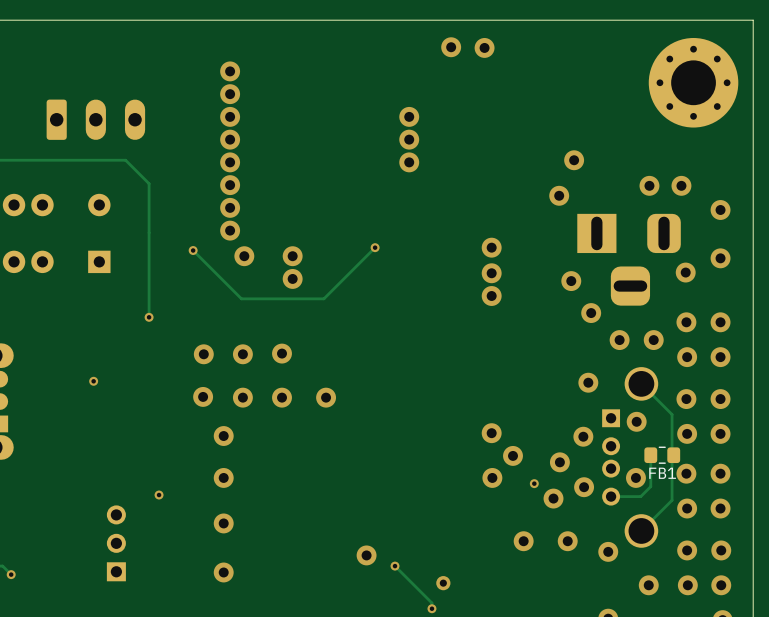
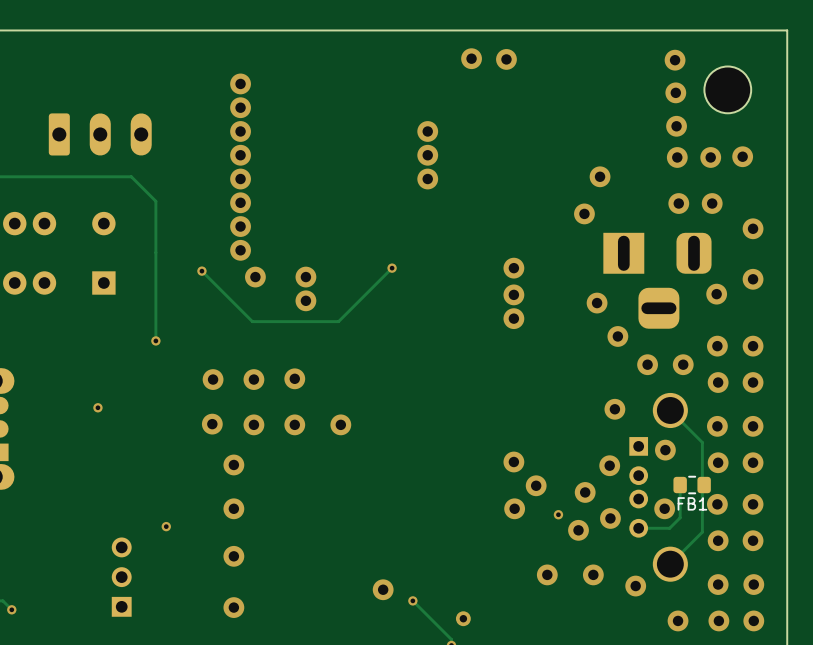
part footprint: [648, 38, 739, 128] -> [704, 66, 752, 114]
via: none -> (675, 60)
via: none -> (675, 92)
via: none -> (676, 126)
via: none -> (677, 157)
via: none -> (710, 157)
via: none -> (742, 156)

